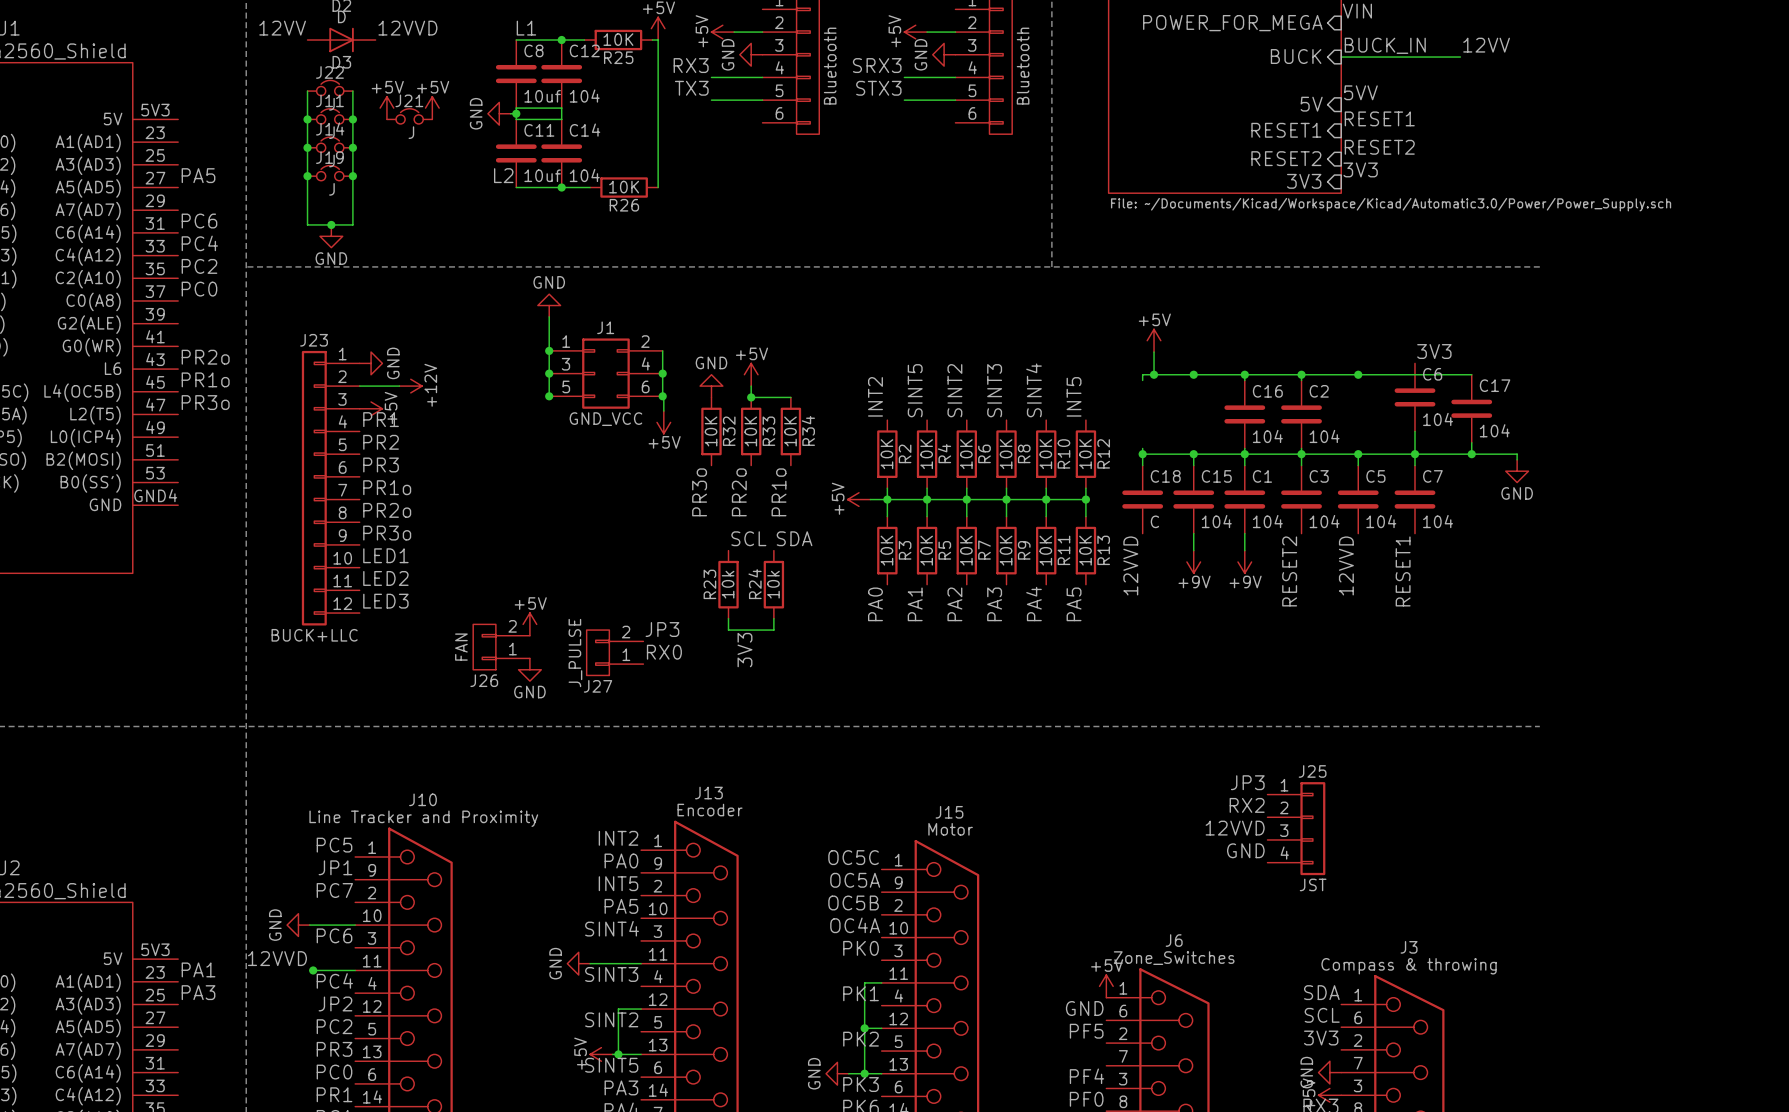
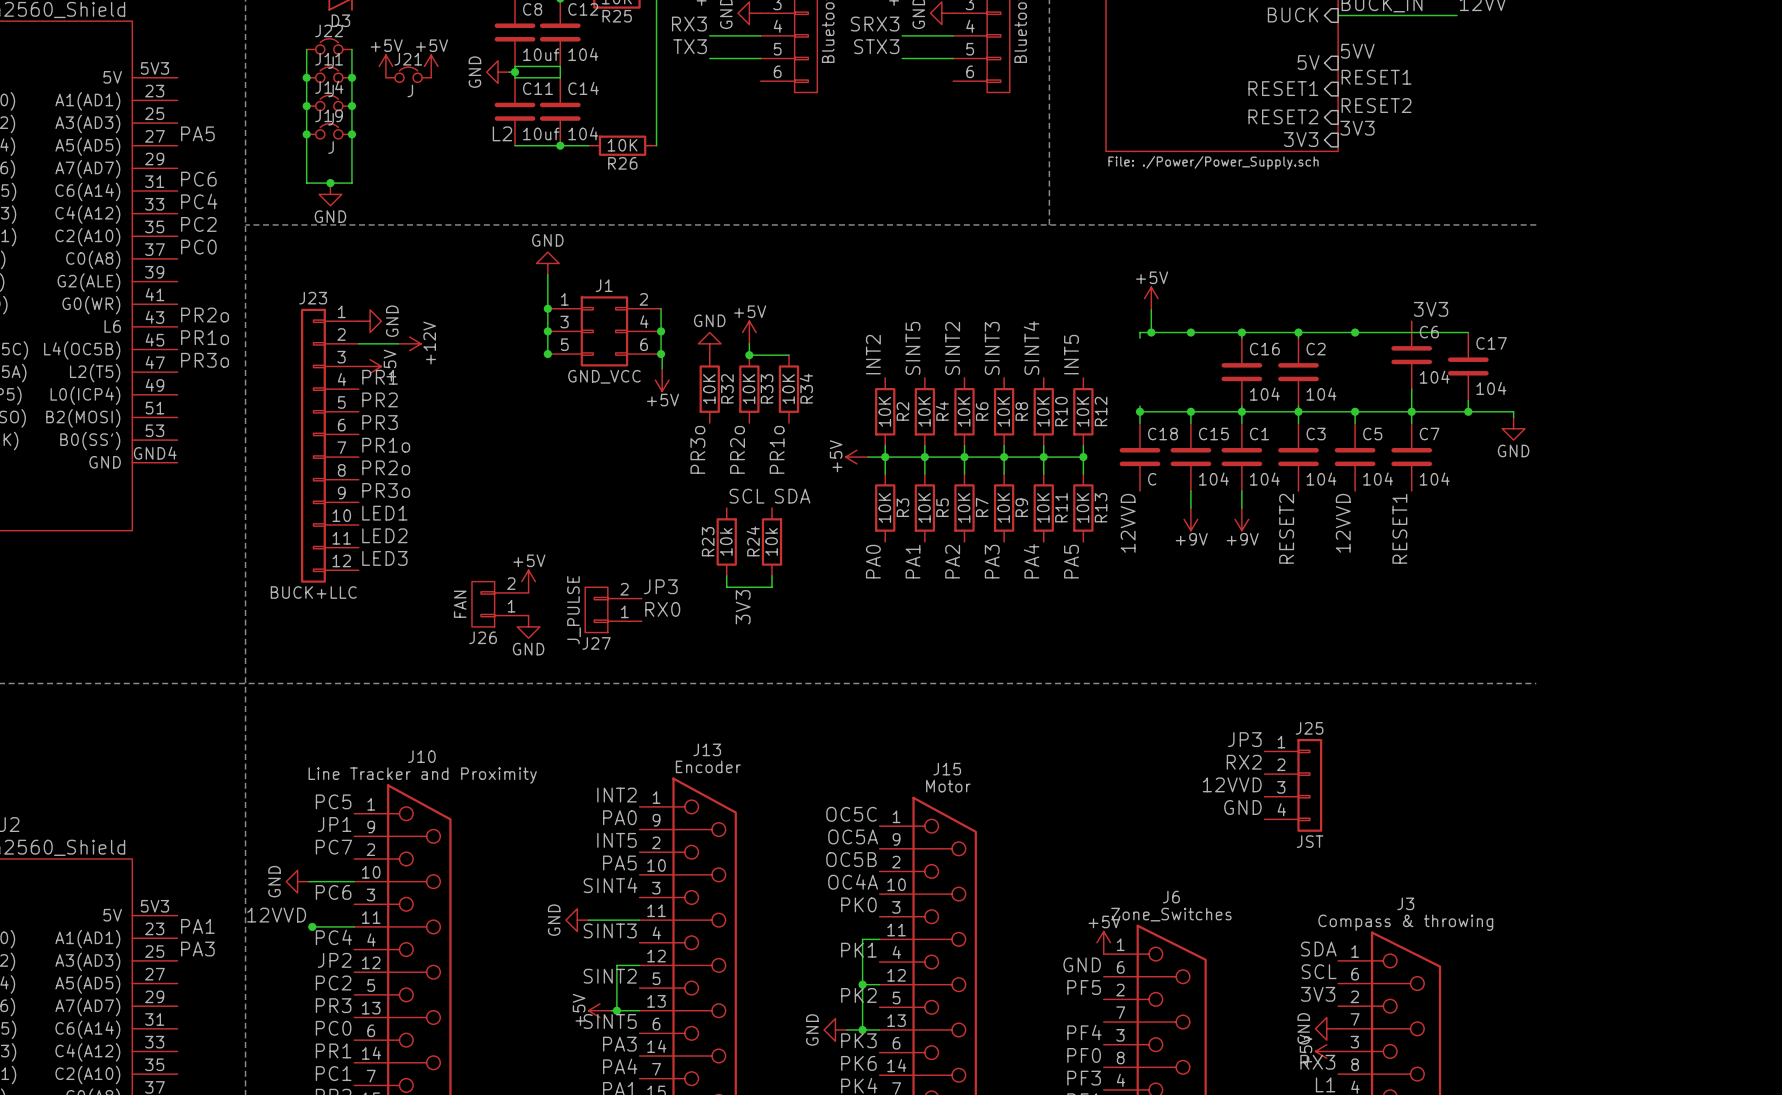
sheet value: File: ~/Documents/Kicad/Workspace/Kicad/Automatic3.0/Power/Power_Supply.sch (1391, 204) -> File: ./Power/Power_Supply.sch (1213, 162)

